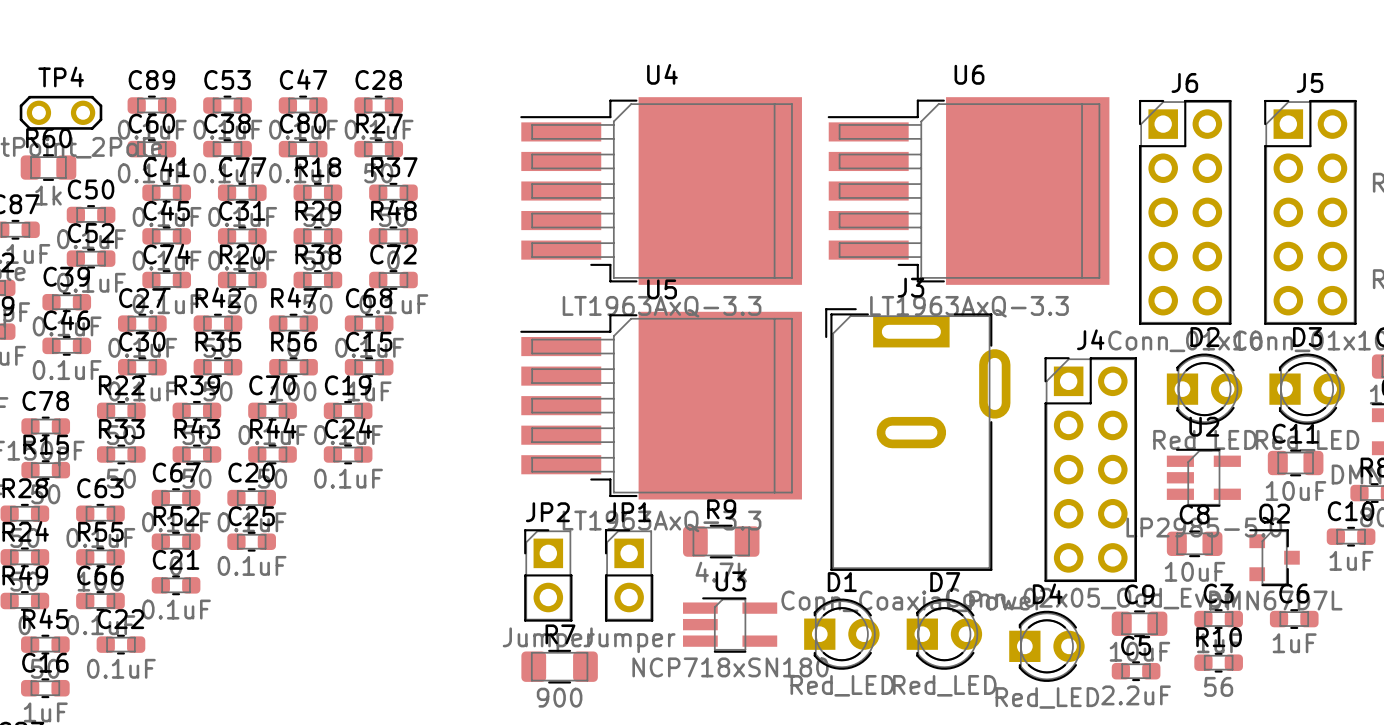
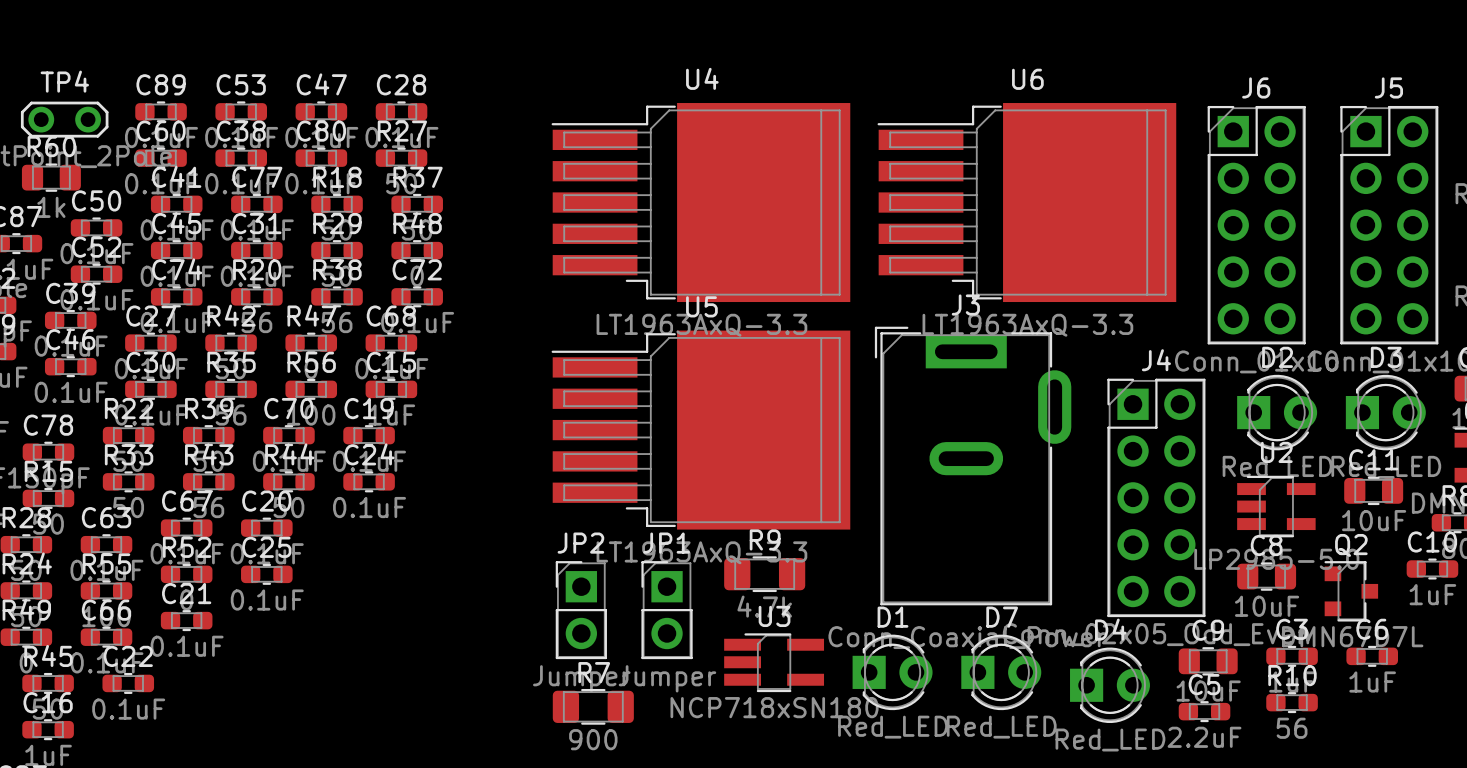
R20 value: 50 (242, 304) -> 56 (256, 322)
R38 value: 50 (317, 304) -> 56 (337, 322)
R35 value: 50 (217, 391) -> 56 (231, 415)
R43 value: 50 (196, 478) -> 56 (208, 507)

